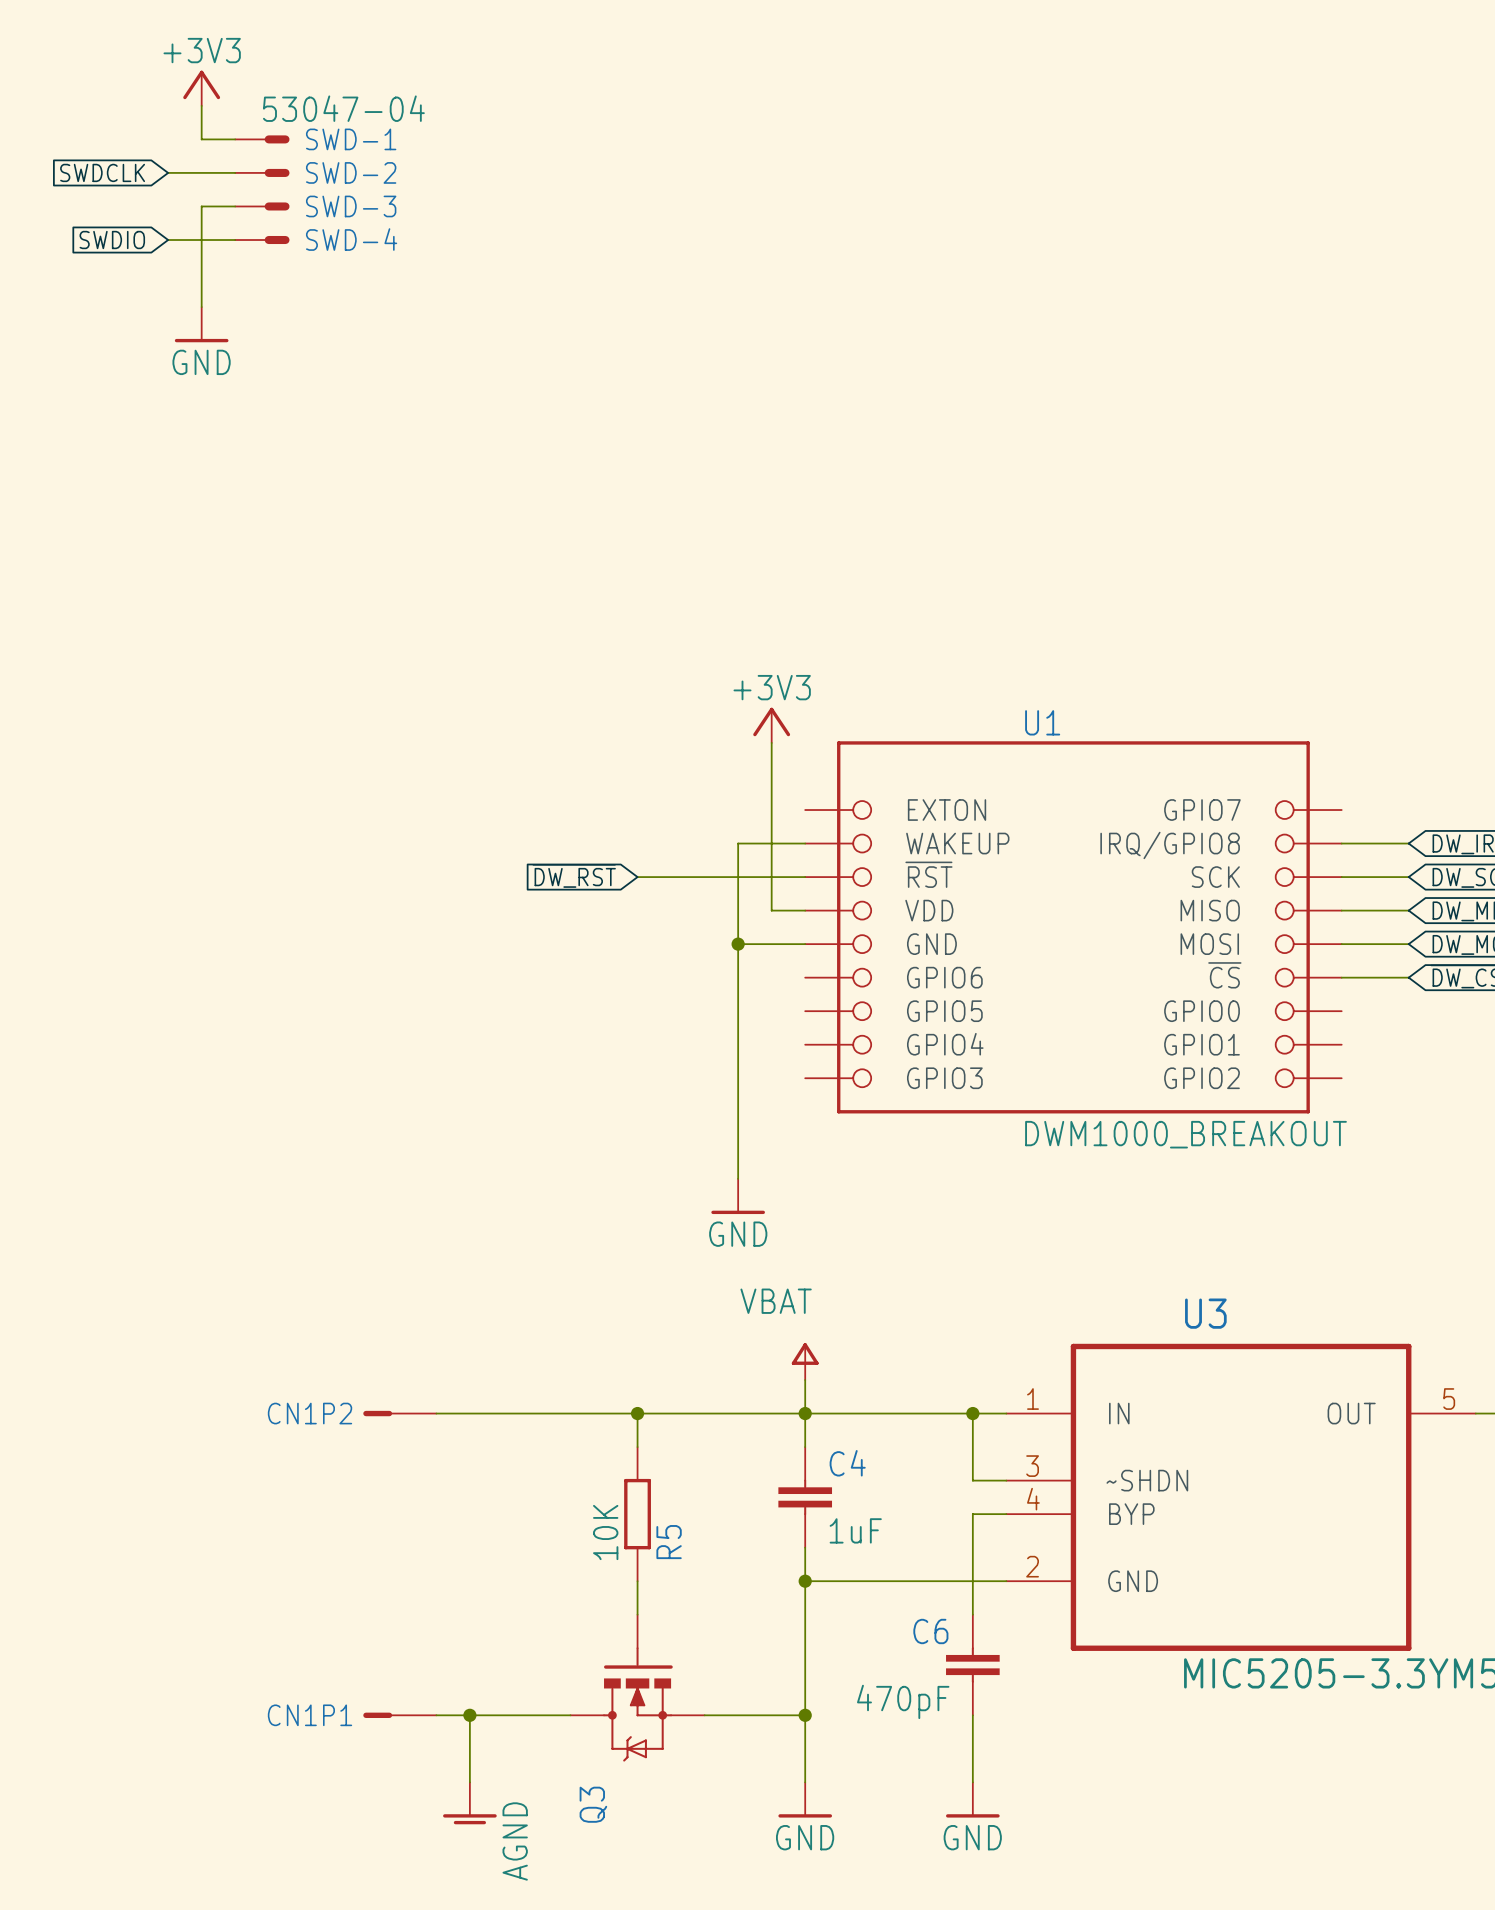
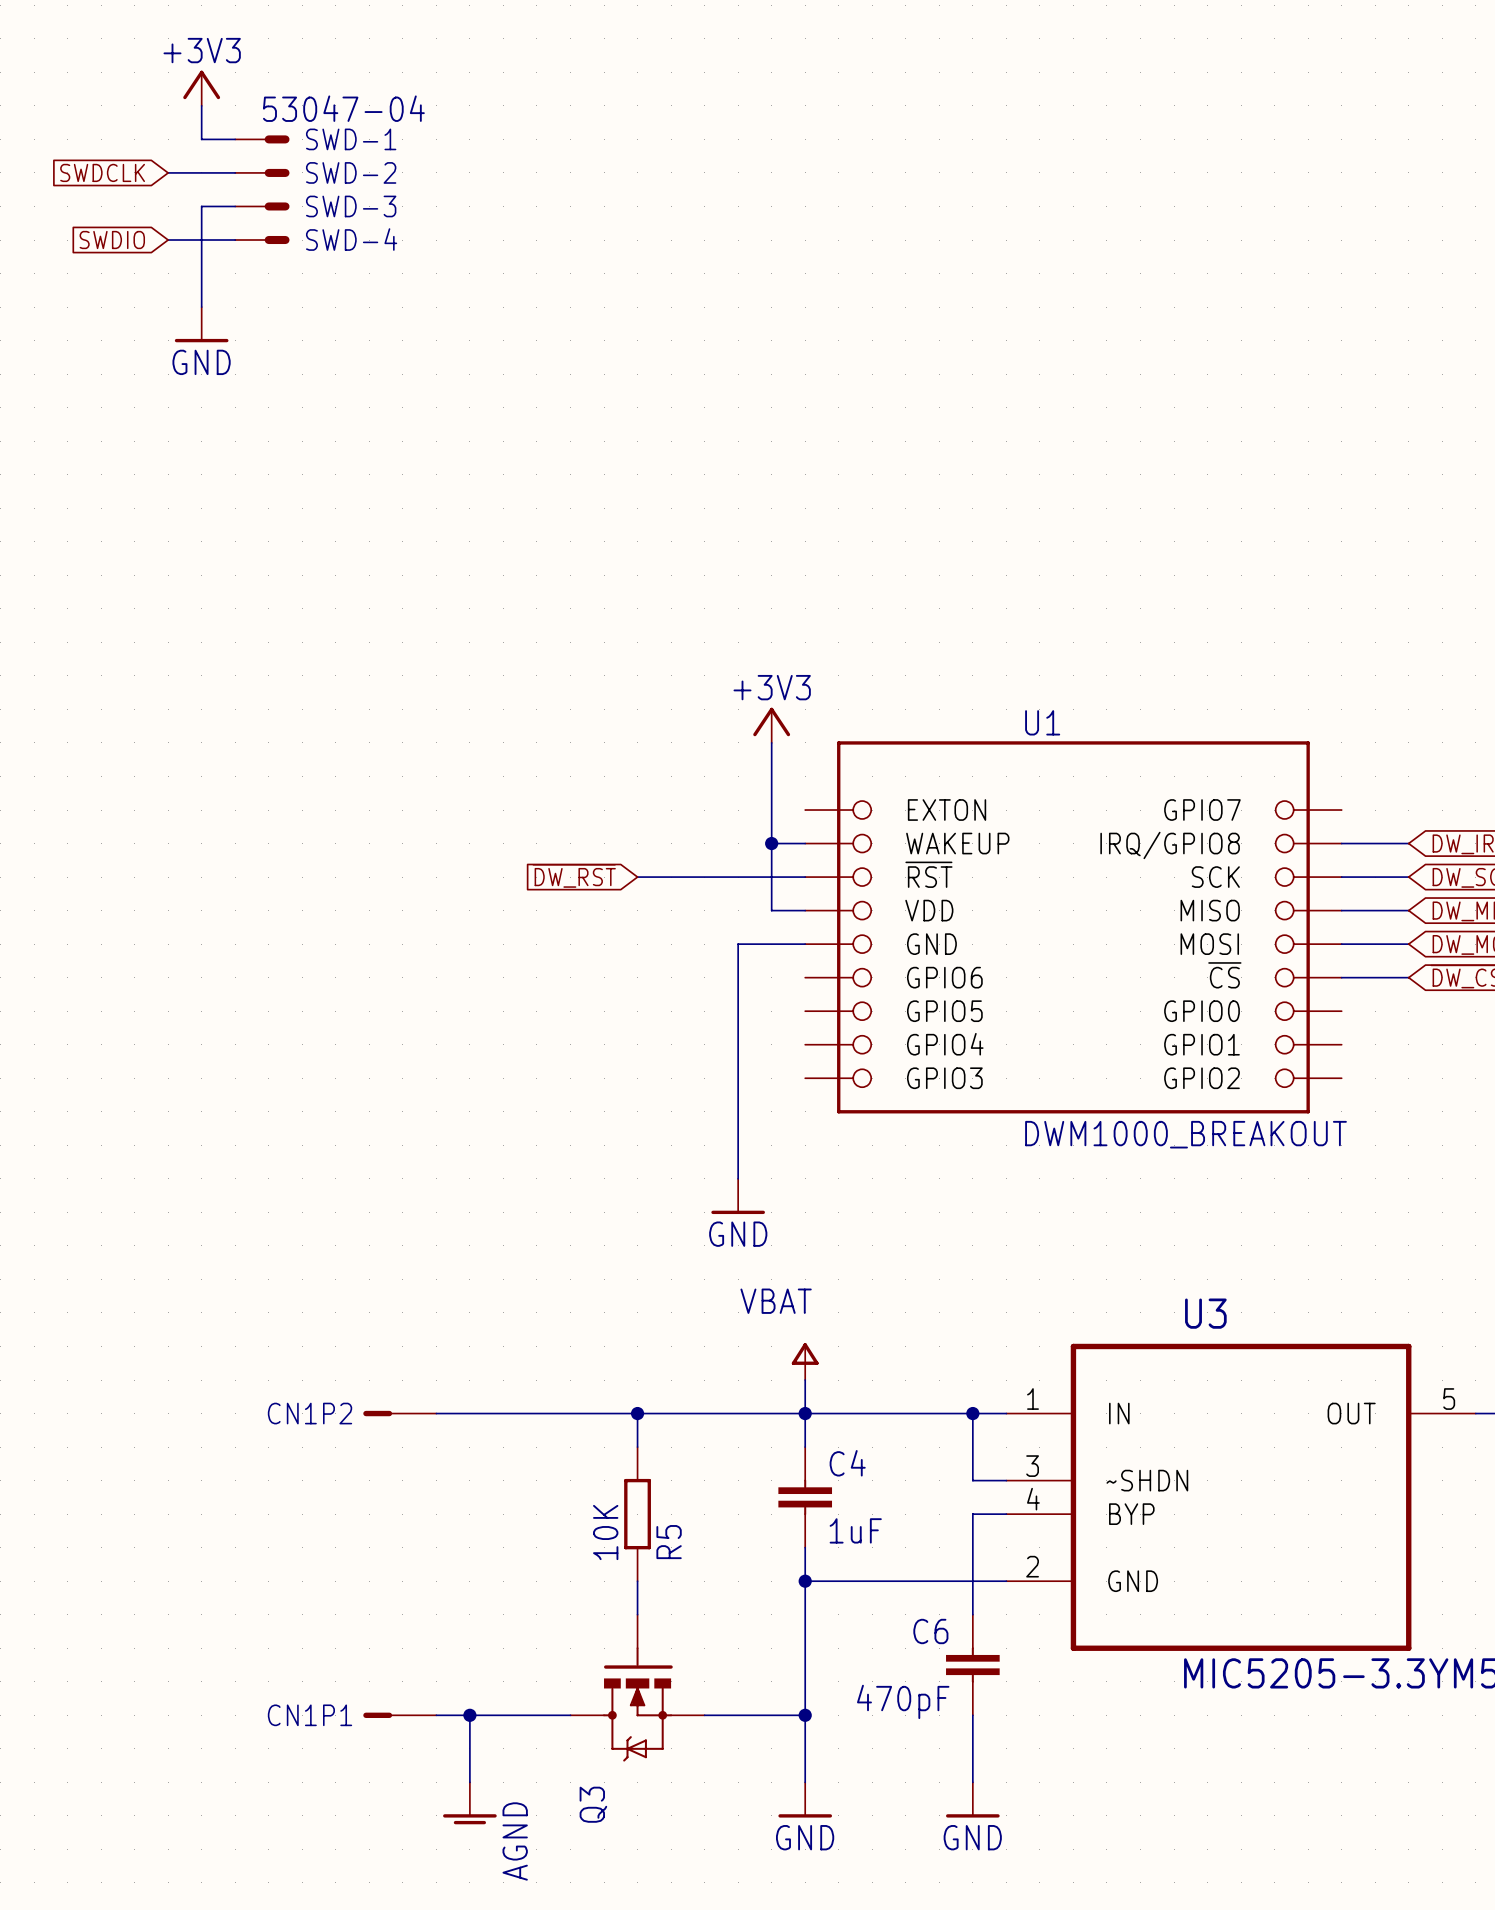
wire: (771, 843) (738, 843) (738, 944) -> none
junction: none -> (771, 843)
junction: (738, 944) -> none

